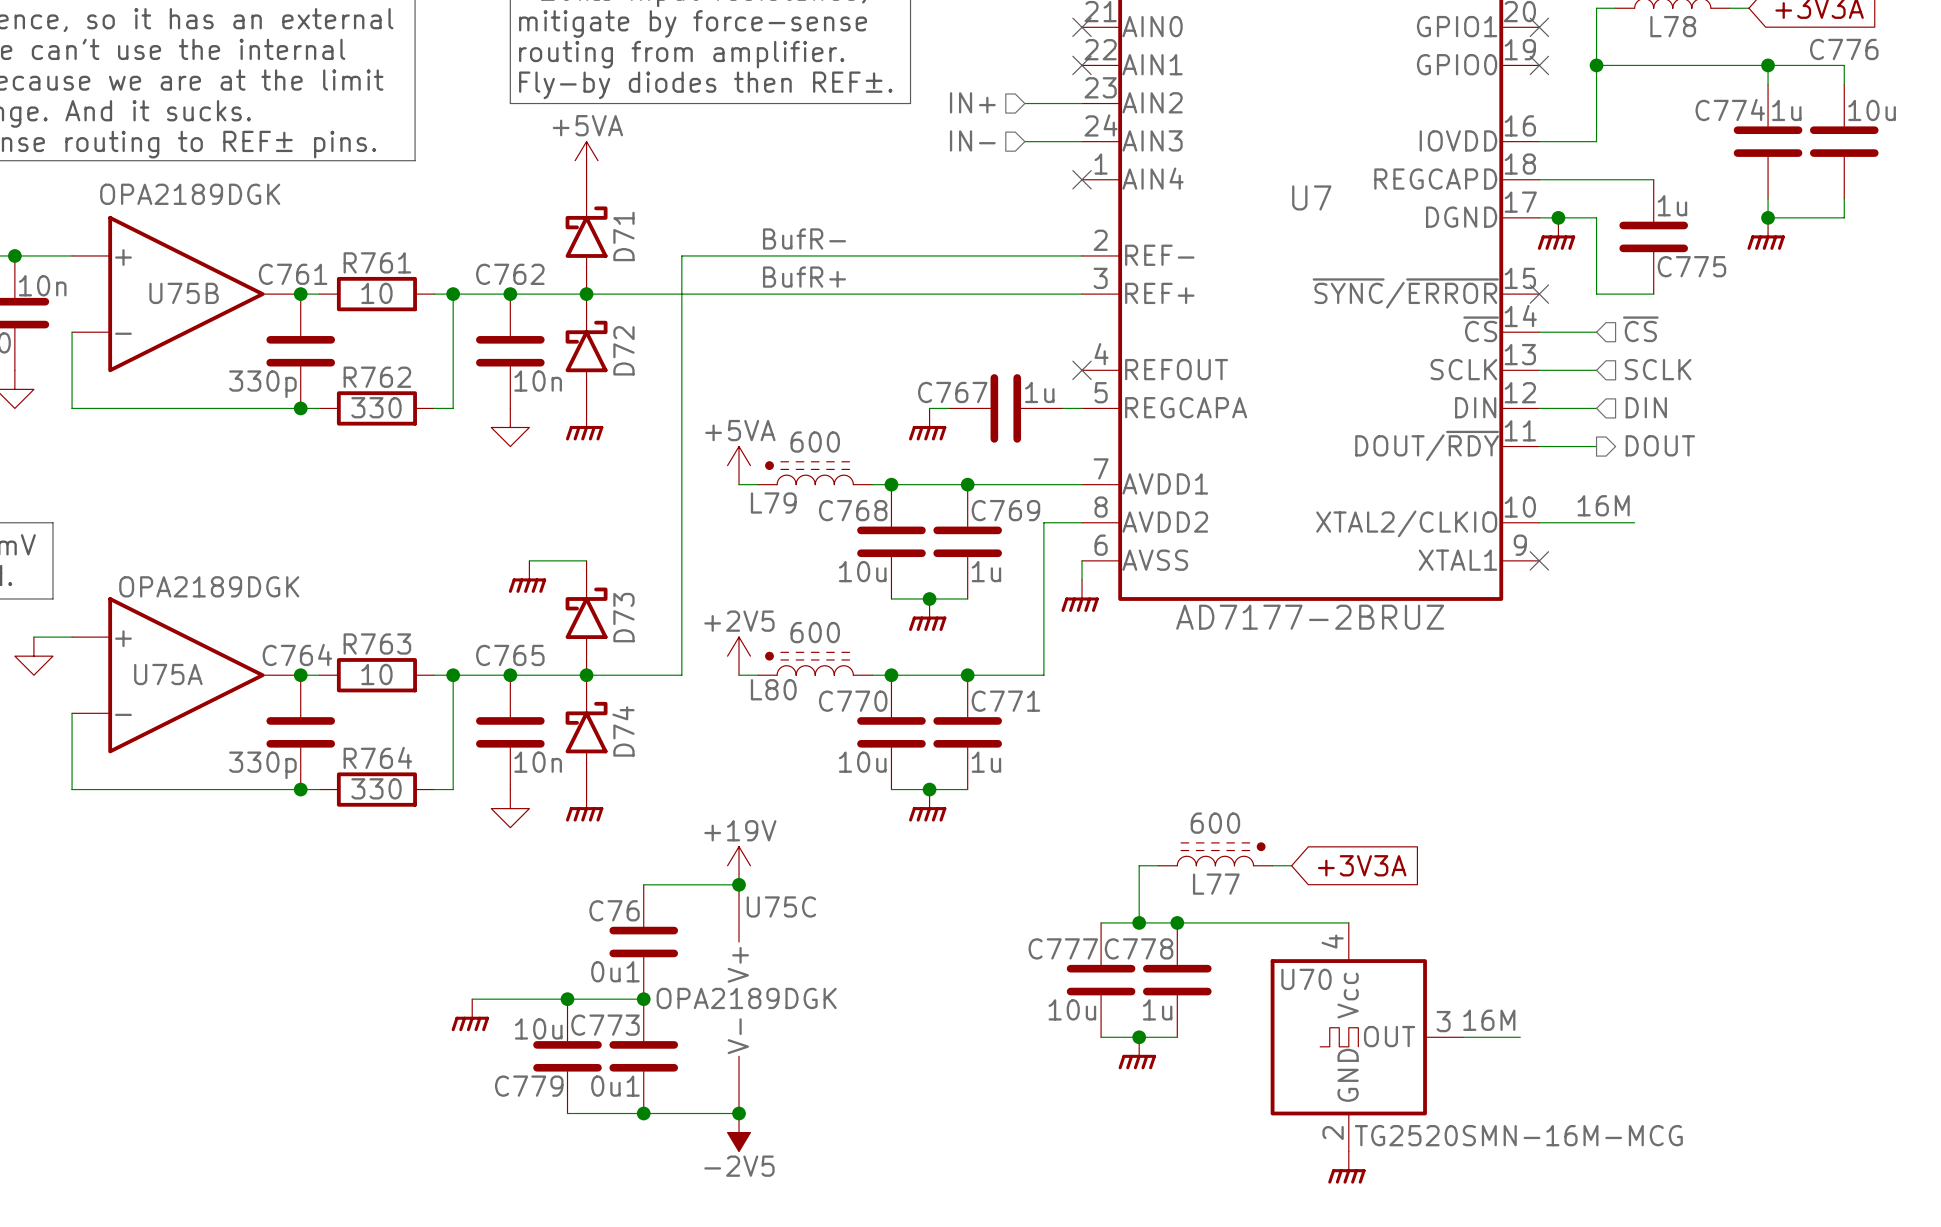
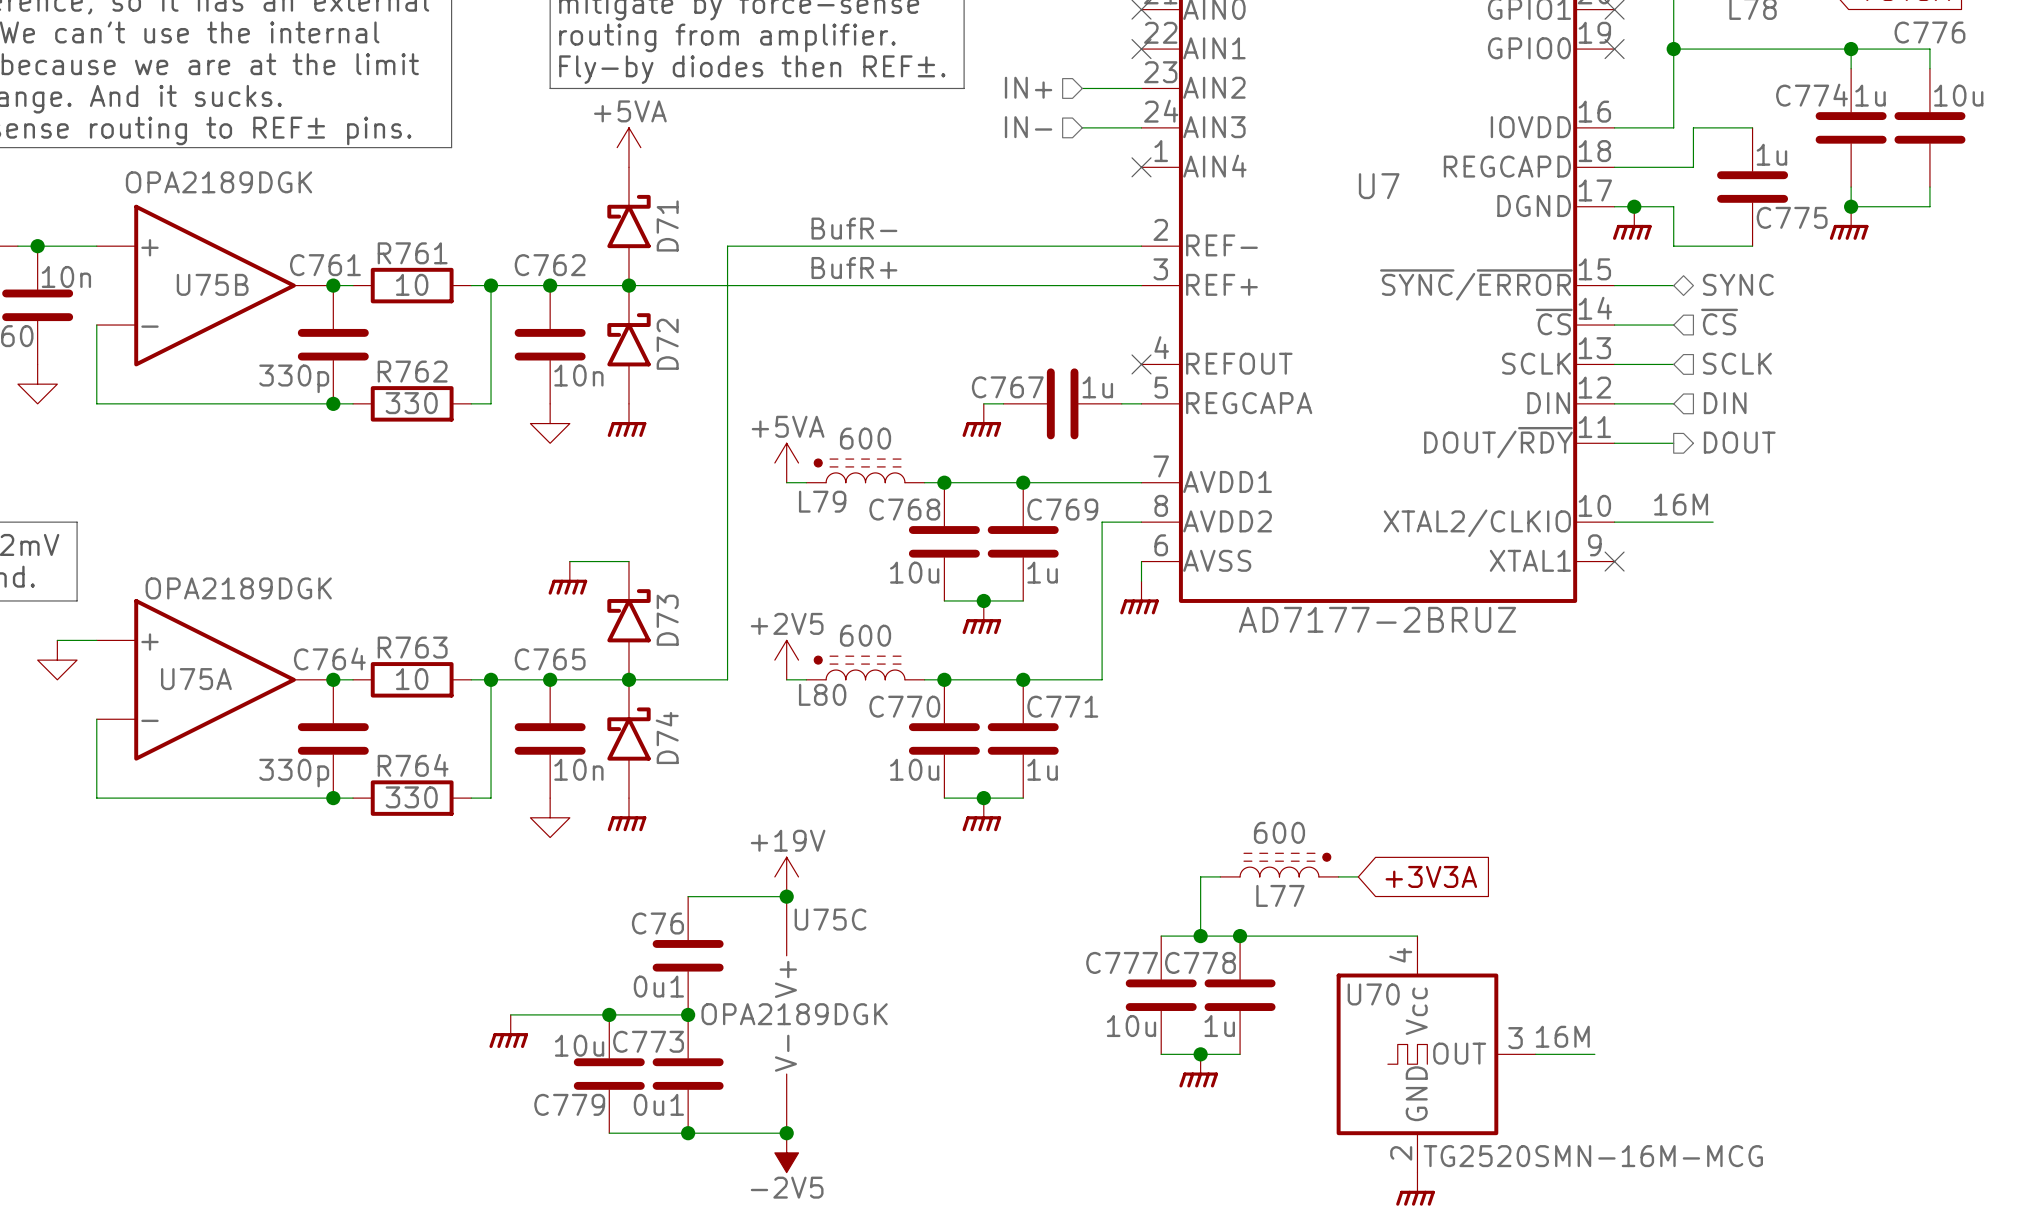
wire: (1615, 179) (1653, 179) -> (1693, 167) (1693, 127) (1752, 127)
C775 position: (1653, 236) -> (1752, 187)
wire: (1596, 255) (1596, 294) (1653, 294) -> (1673, 246) (1752, 246)
hierarchical label: none -> SYNC (1738, 284)
wire: none -> (1614, 285) (1673, 285)
no-connect mark: (1539, 294) -> none

